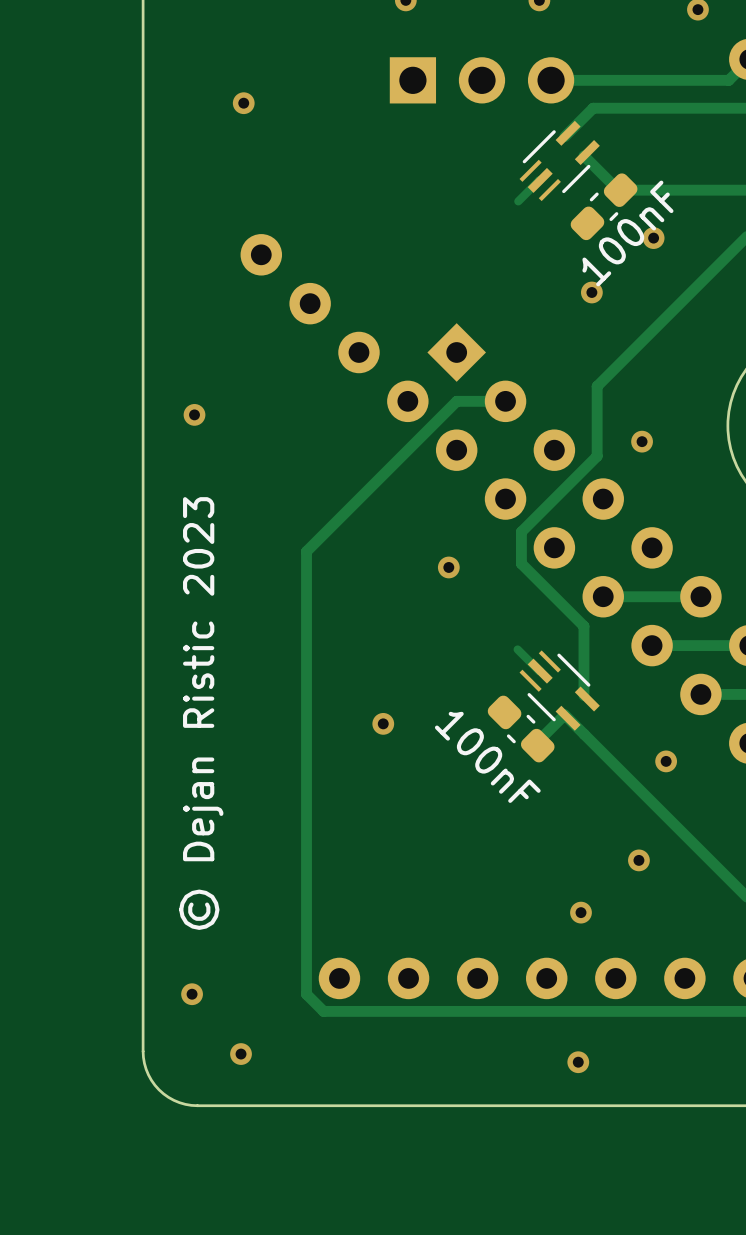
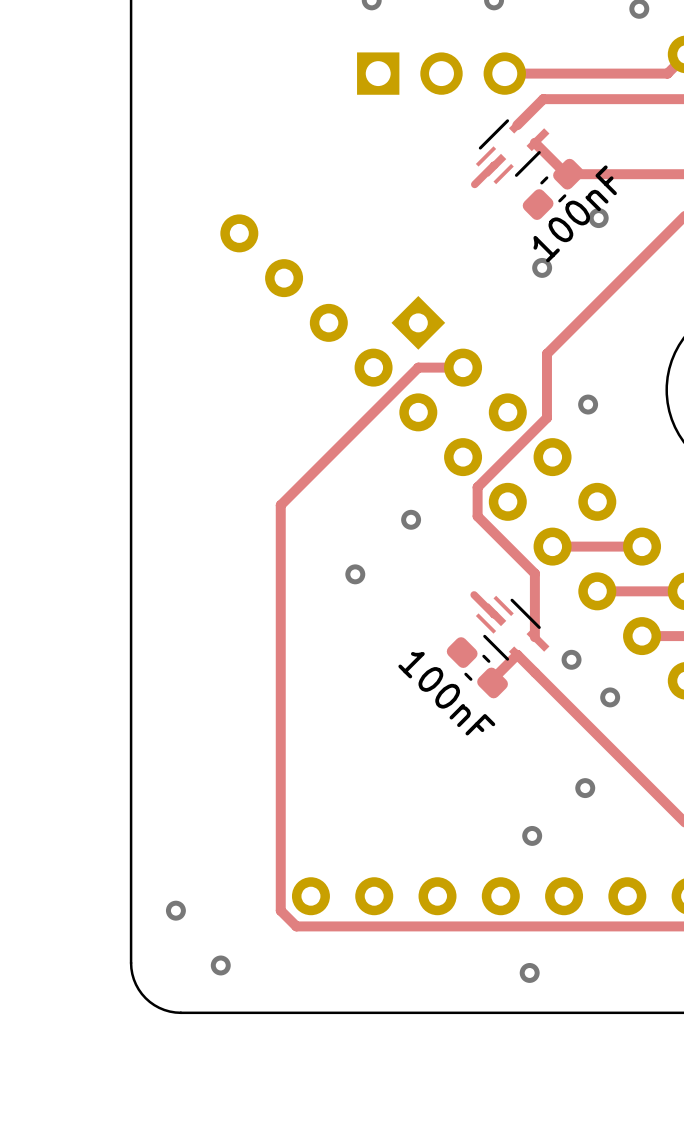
via: (243, 103) -> none
via: (194, 414) -> none
text: © Dejan Ristic 2023 (201, 713) -> none
via: none -> (571, 659)
via position: (383, 723) -> (355, 574)

